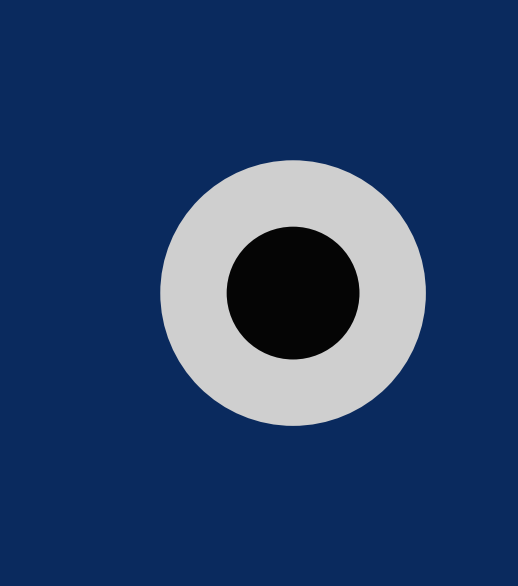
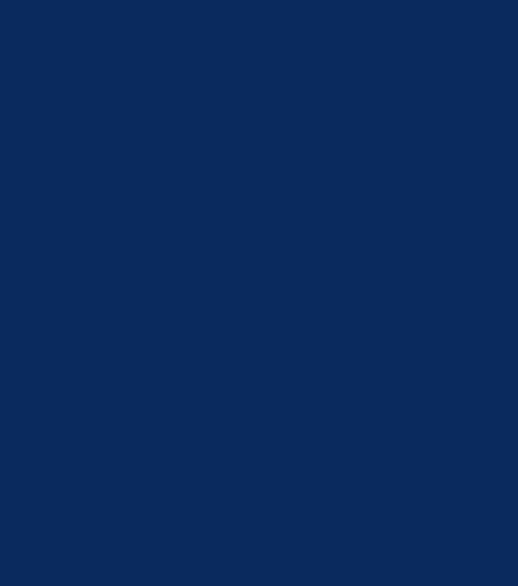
part: (293, 293) -> none

